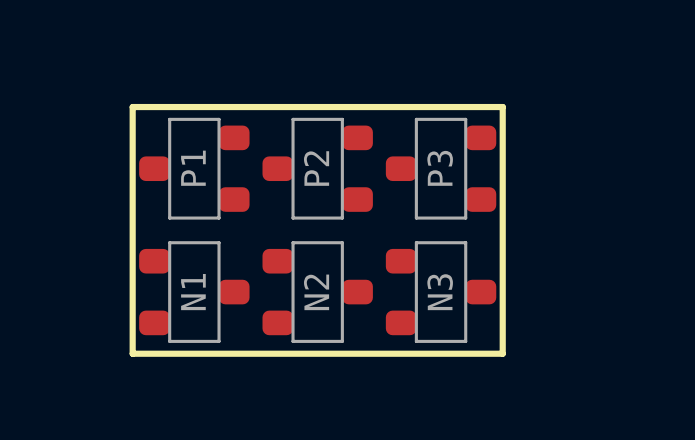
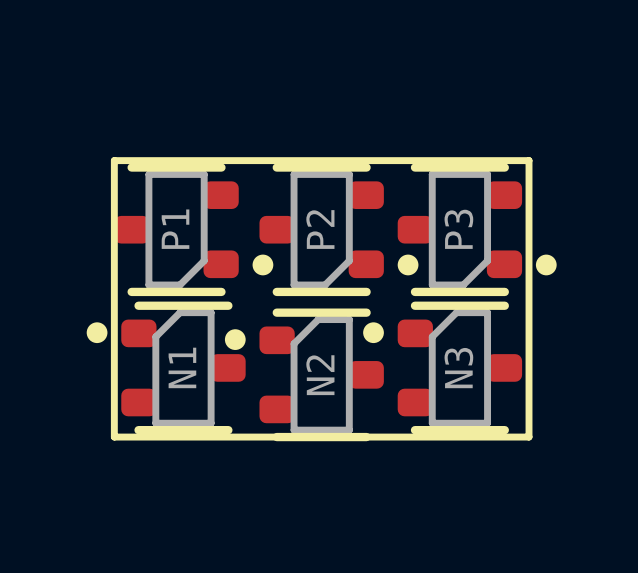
P1 footprint: [139, 117, 250, 220] -> [114, 163, 274, 297]
P2 footprint: [262, 117, 373, 220] -> [259, 163, 419, 297]
P3 footprint: [385, 117, 497, 220] -> [397, 163, 557, 297]
N1 footprint: [139, 241, 250, 343] -> [86, 301, 246, 435]
N2 footprint: [262, 241, 373, 343] -> [224, 308, 384, 442]
N3 footprint: [385, 241, 497, 343] -> [363, 301, 523, 435]

